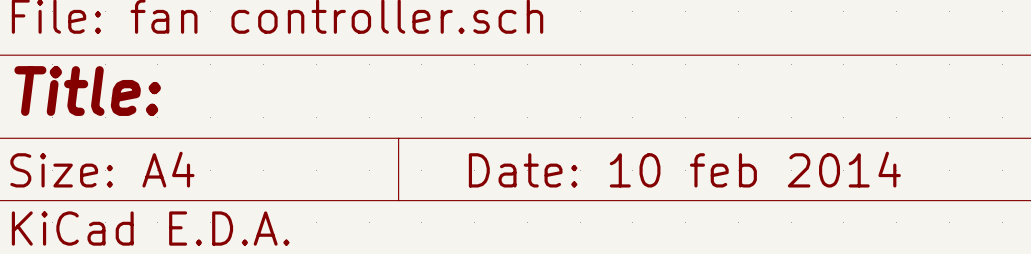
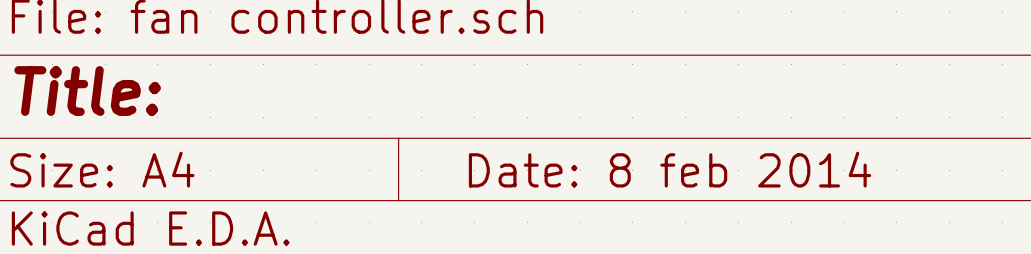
title block: Date: 10 feb 2014 (684, 169) -> Date: 8 feb 2014 (670, 169)

